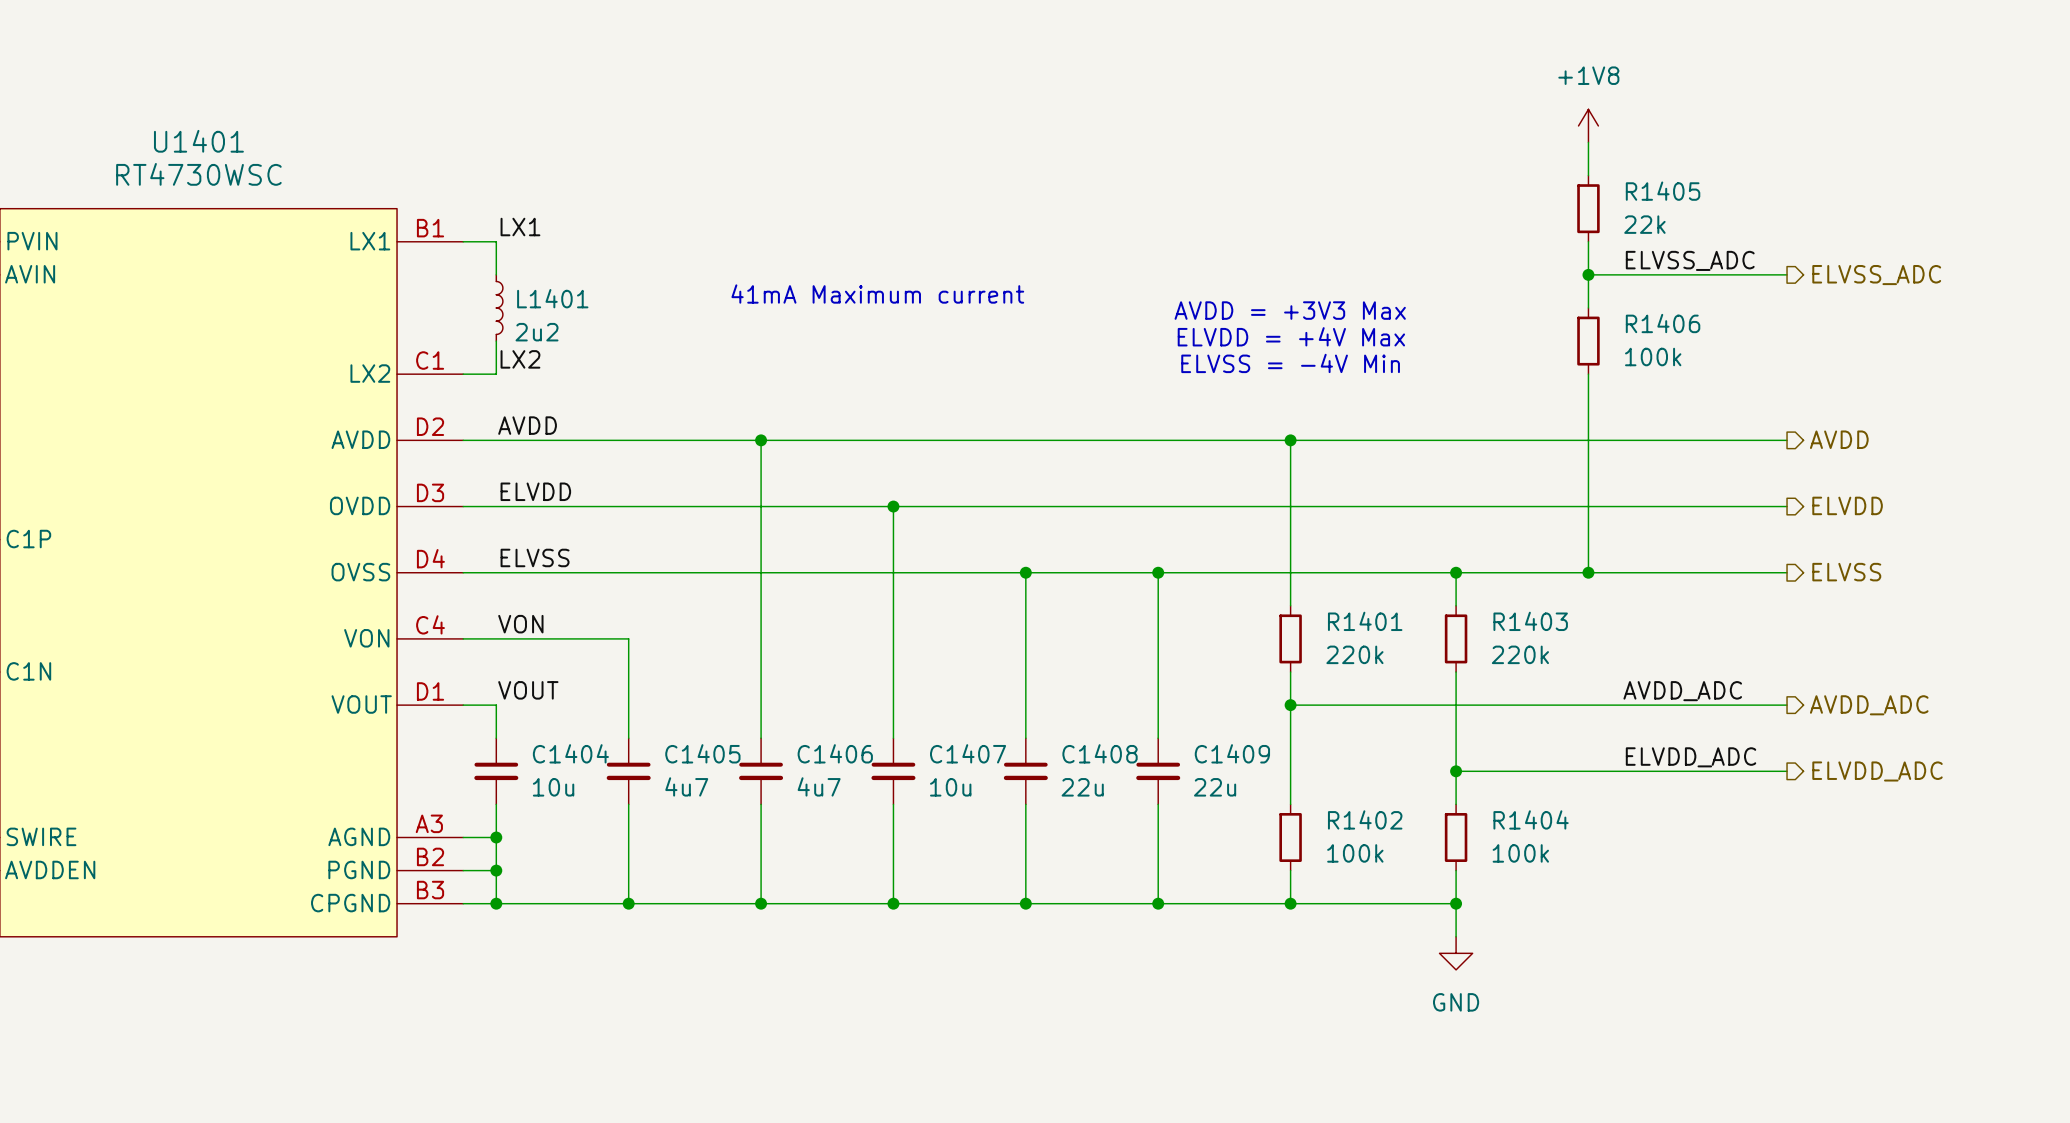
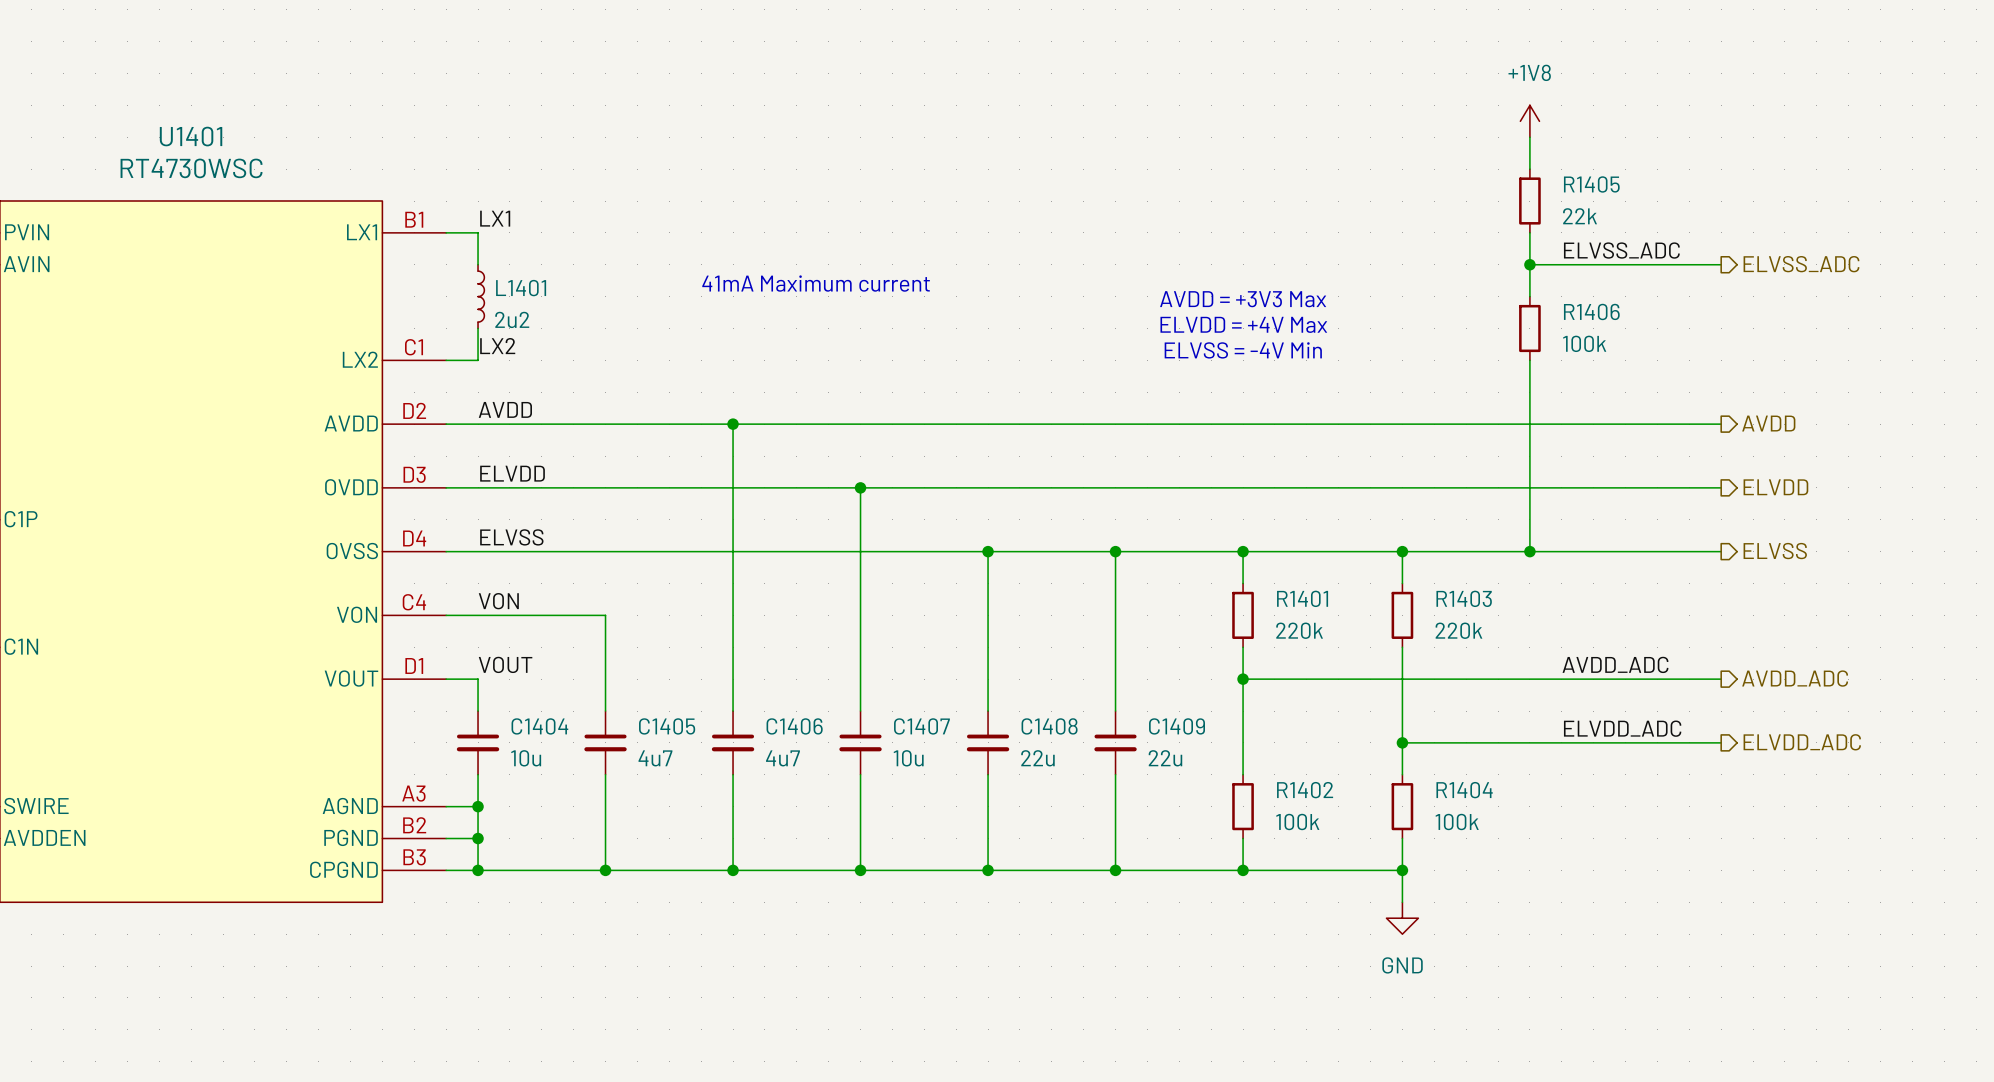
wire: (1290, 440) (1290, 572) -> none
junction: (1290, 440) -> none
junction: none -> (1243, 551)

